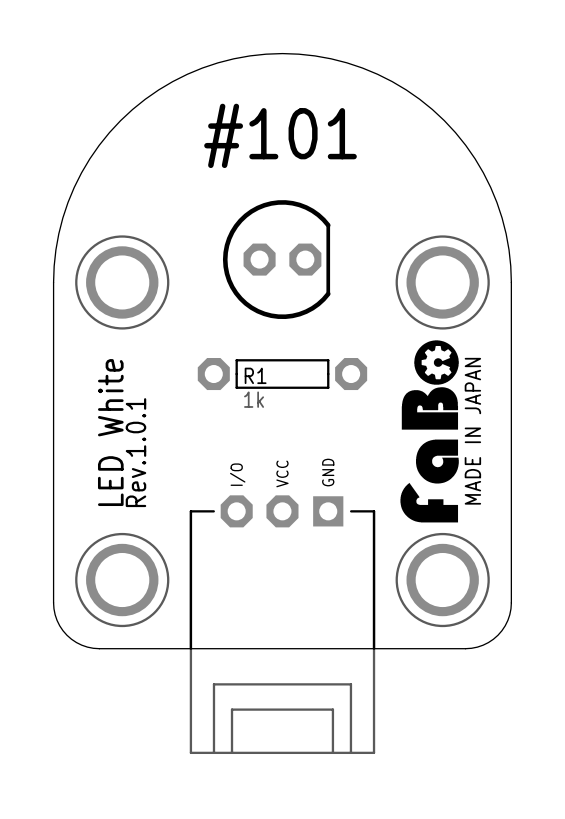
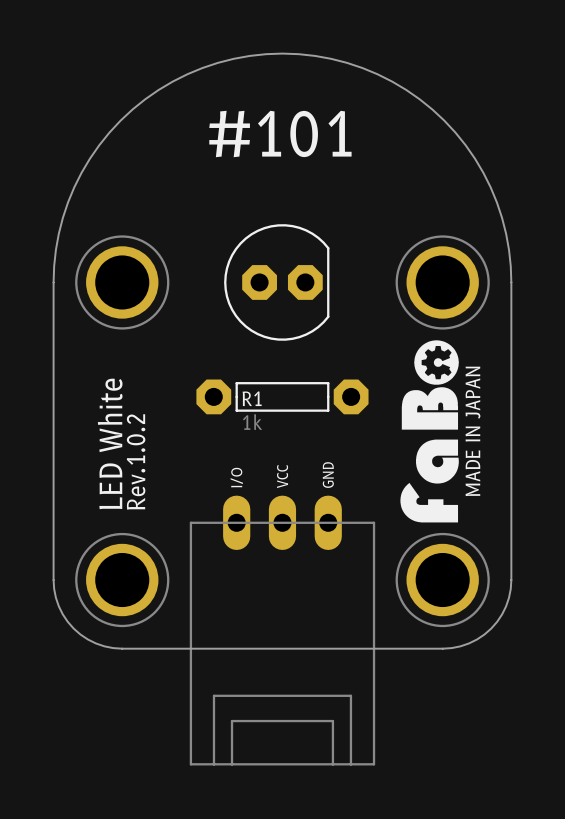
part footprint: [53, 53, 512, 755] -> [53, 53, 512, 766]
part: (276, 259) -> none
part: none -> (276, 282)
R1 footprint: [197, 358, 368, 391] -> [196, 379, 369, 415]
text: Rev.1.0.1 (135, 452) -> Rev.1.0.2 (136, 461)

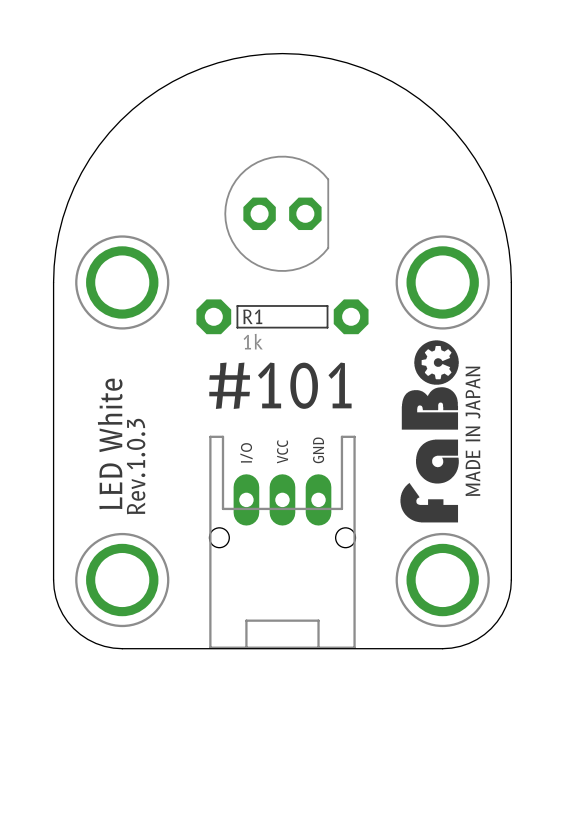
text position: #101 (280, 133) -> #101 (280, 385)
part: none -> (276, 213)
part: (276, 282) -> none
part: none -> (282, 351)
R1 footprint: [196, 379, 369, 415] -> [196, 299, 369, 335]
part: (282, 409) -> none
text: Rev.1.0.2 (136, 461) -> Rev.1.0.3 (136, 466)

